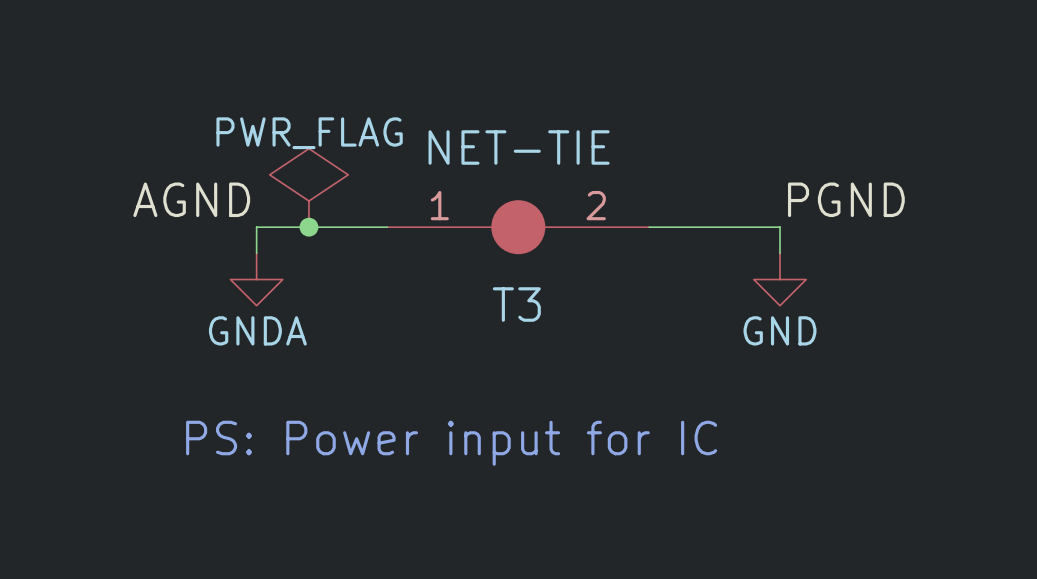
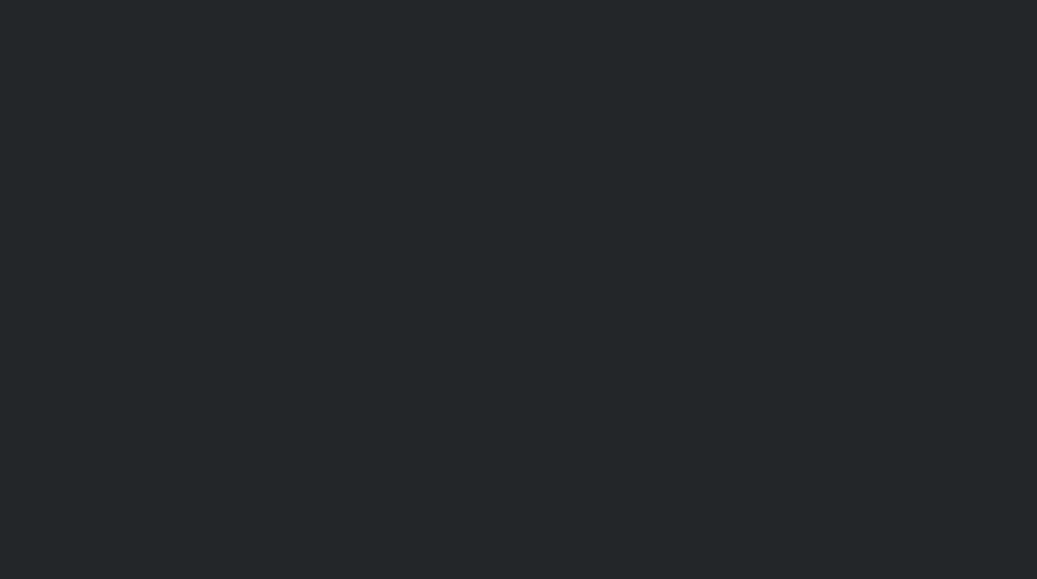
power symbol: PWR_FLAG (308, 187) -> none
label: AGND (191, 199) -> none
label: PGND (846, 199) -> none
junction: (308, 227) -> none
wire: (387, 227) (256, 227) (256, 253) -> none
T3: NET-TIE (518, 227) -> none
wire: (649, 227) (780, 227) (780, 253) -> none
power symbol: GNDA (256, 279) -> none
power symbol: GND (780, 279) -> none
text: PS: Power input for IC (451, 443) -> none

